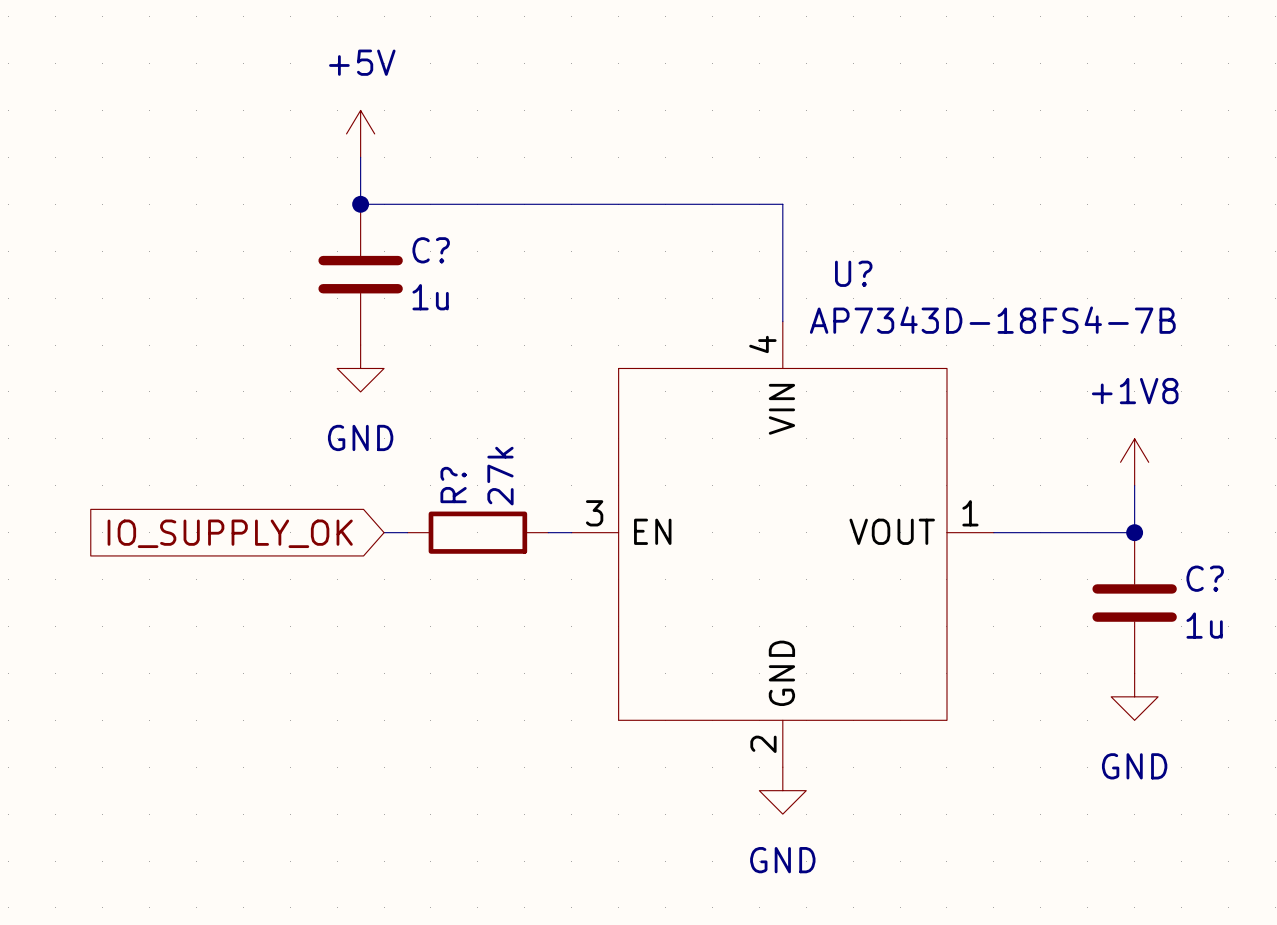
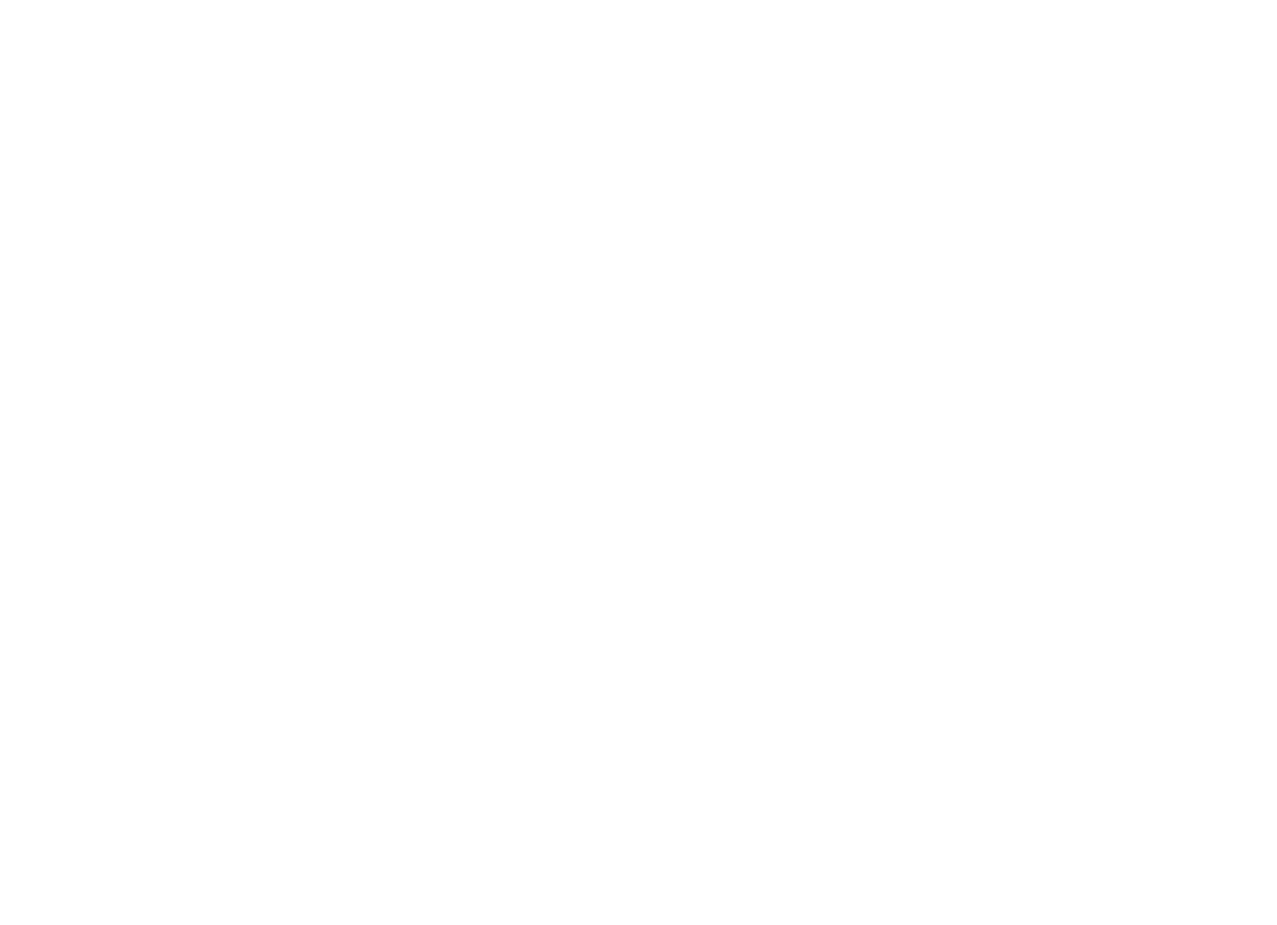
power symbol: +5V (360, 133) -> none
wire: (360, 157) (360, 204) (782, 204) (782, 321) -> none
junction: (360, 204) -> none
C?: 1u (360, 274) -> none
power symbol: GND (360, 368) -> none
power symbol: +1V8 (1134, 462) -> none
wire: (1134, 485) (1134, 532) (993, 532) -> none
wire: (384, 532) (407, 532) -> none
R?: 27k (477, 532) -> none
wire: (548, 532) (571, 532) -> none
junction: (1134, 532) -> none
global label: IO_SUPPLY_OK (230, 533) -> none
U?: AP7343D-18FS4-7B (782, 544) -> none
C?: 1u (1134, 603) -> none
power symbol: GND (1134, 696) -> none
power symbol: GND (782, 790) -> none

